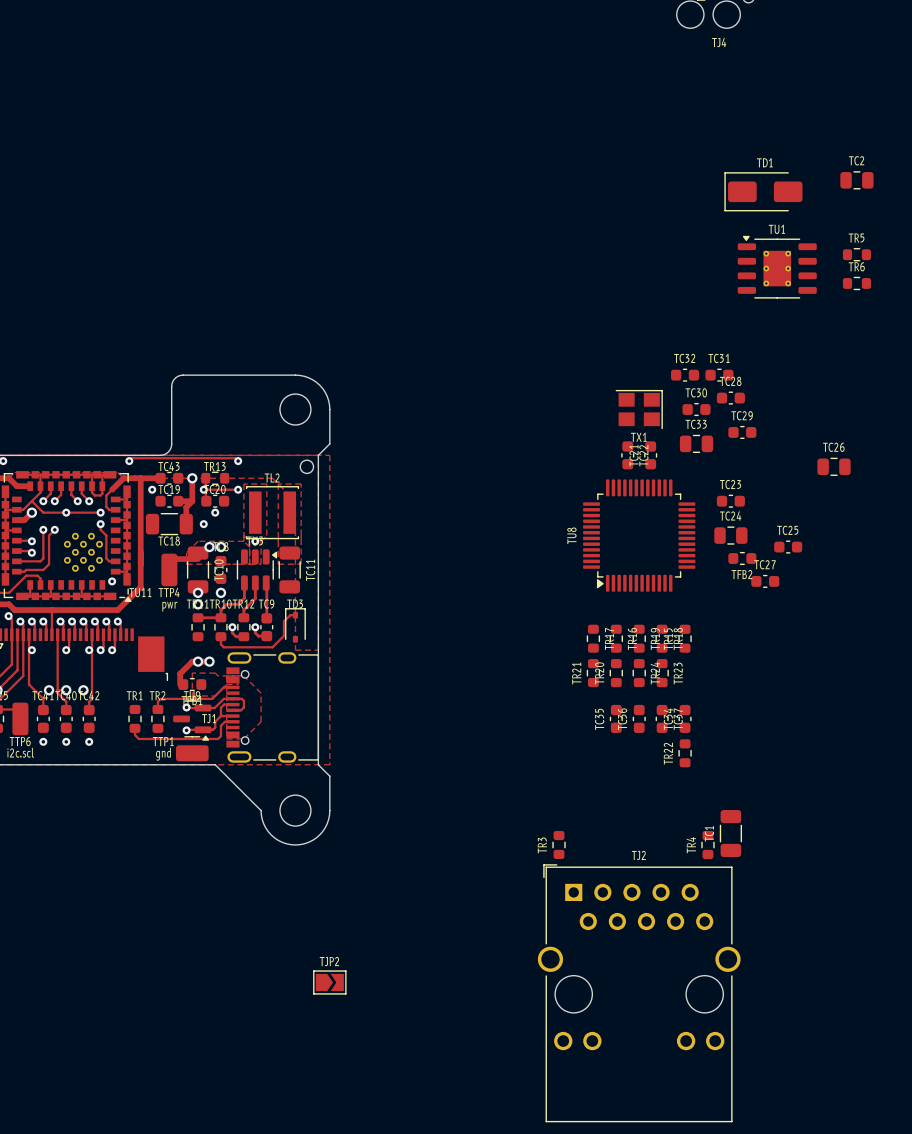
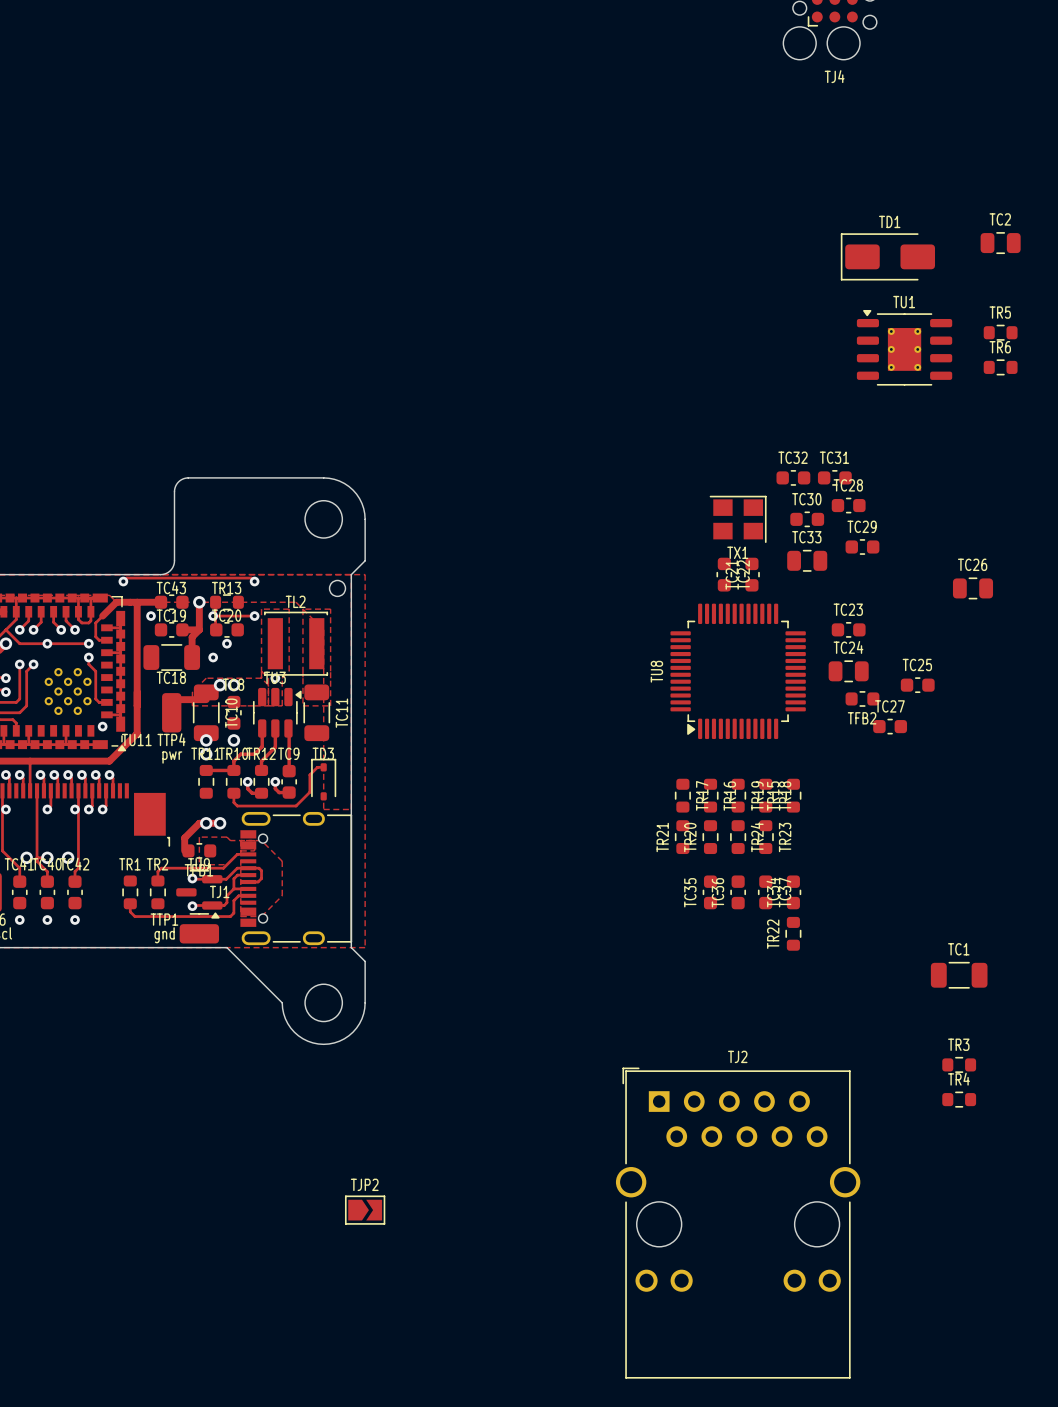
TC1 rotation: 0° (730, 833) -> 90° clockwise (959, 975)
TC1 position: (730, 833) -> (959, 975)
TR3 rotation: 0° (559, 844) -> 90° clockwise (959, 1064)
TR3 position: (559, 844) -> (959, 1064)
TR4 rotation: 0° (707, 844) -> 90° clockwise (959, 1099)
TR4 position: (707, 844) -> (959, 1099)

